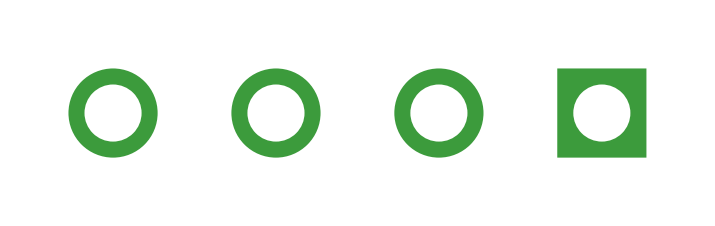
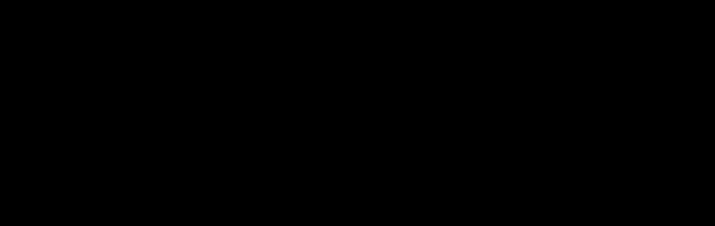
part: (357, 113) -> none

